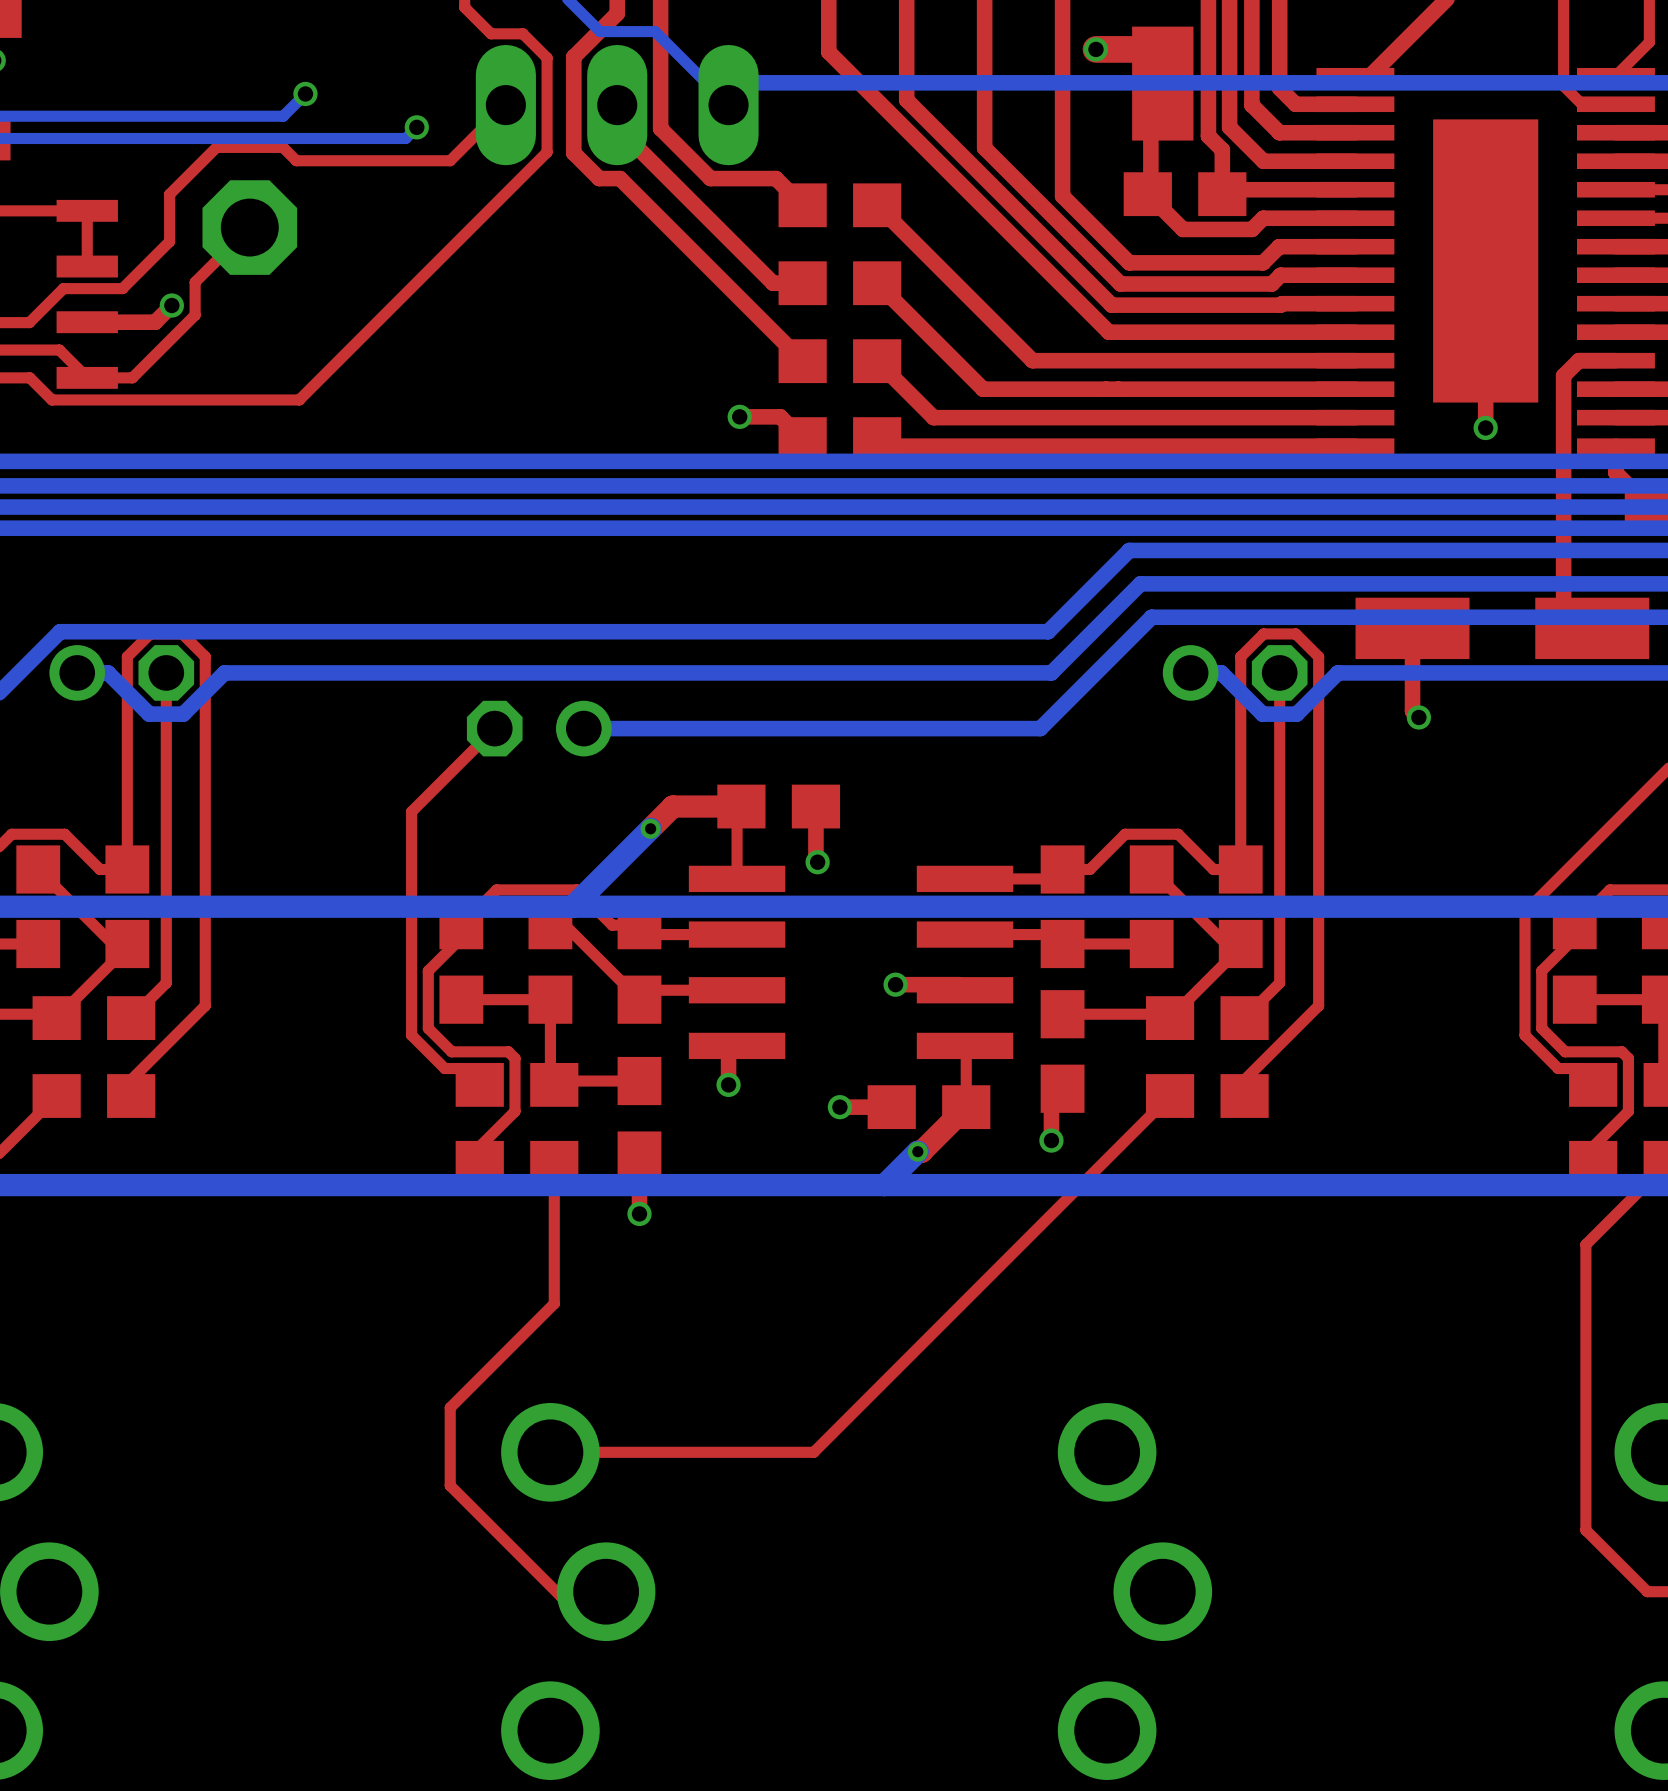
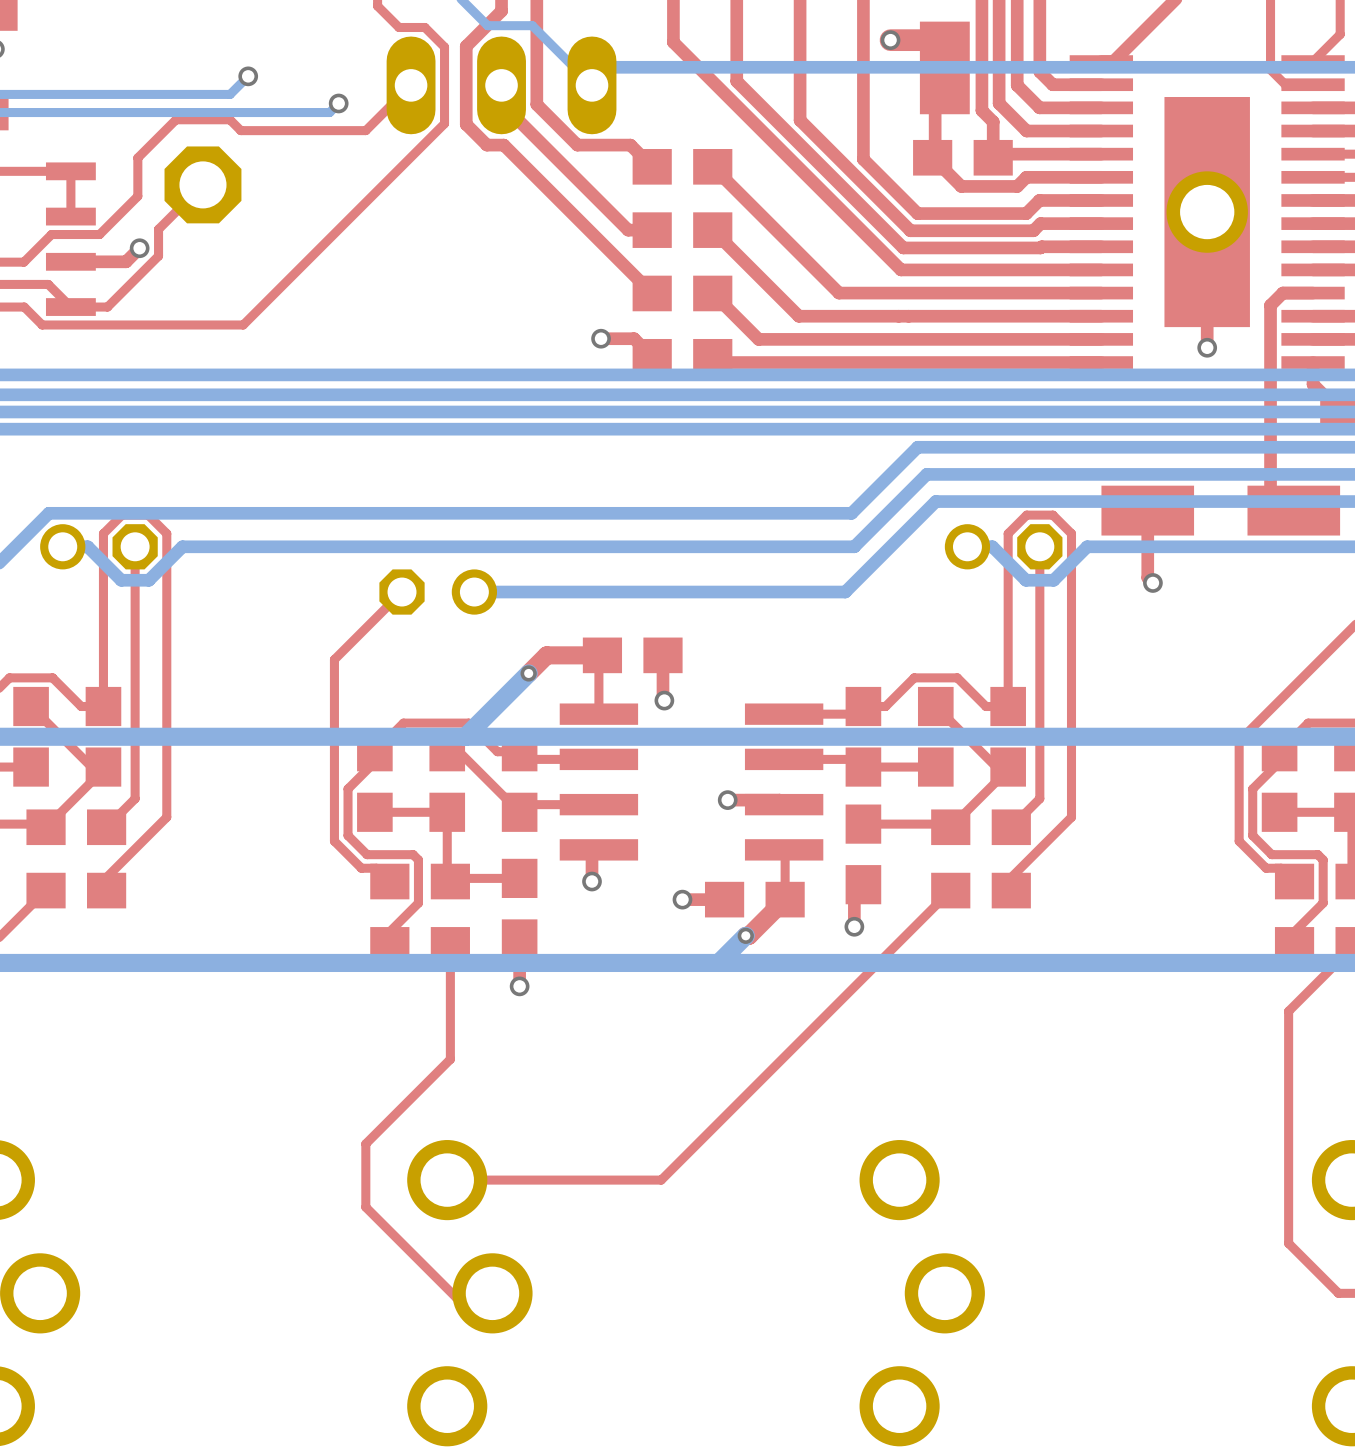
part footprint: [1316, 67, 1655, 454] -> [1069, 55, 1345, 369]

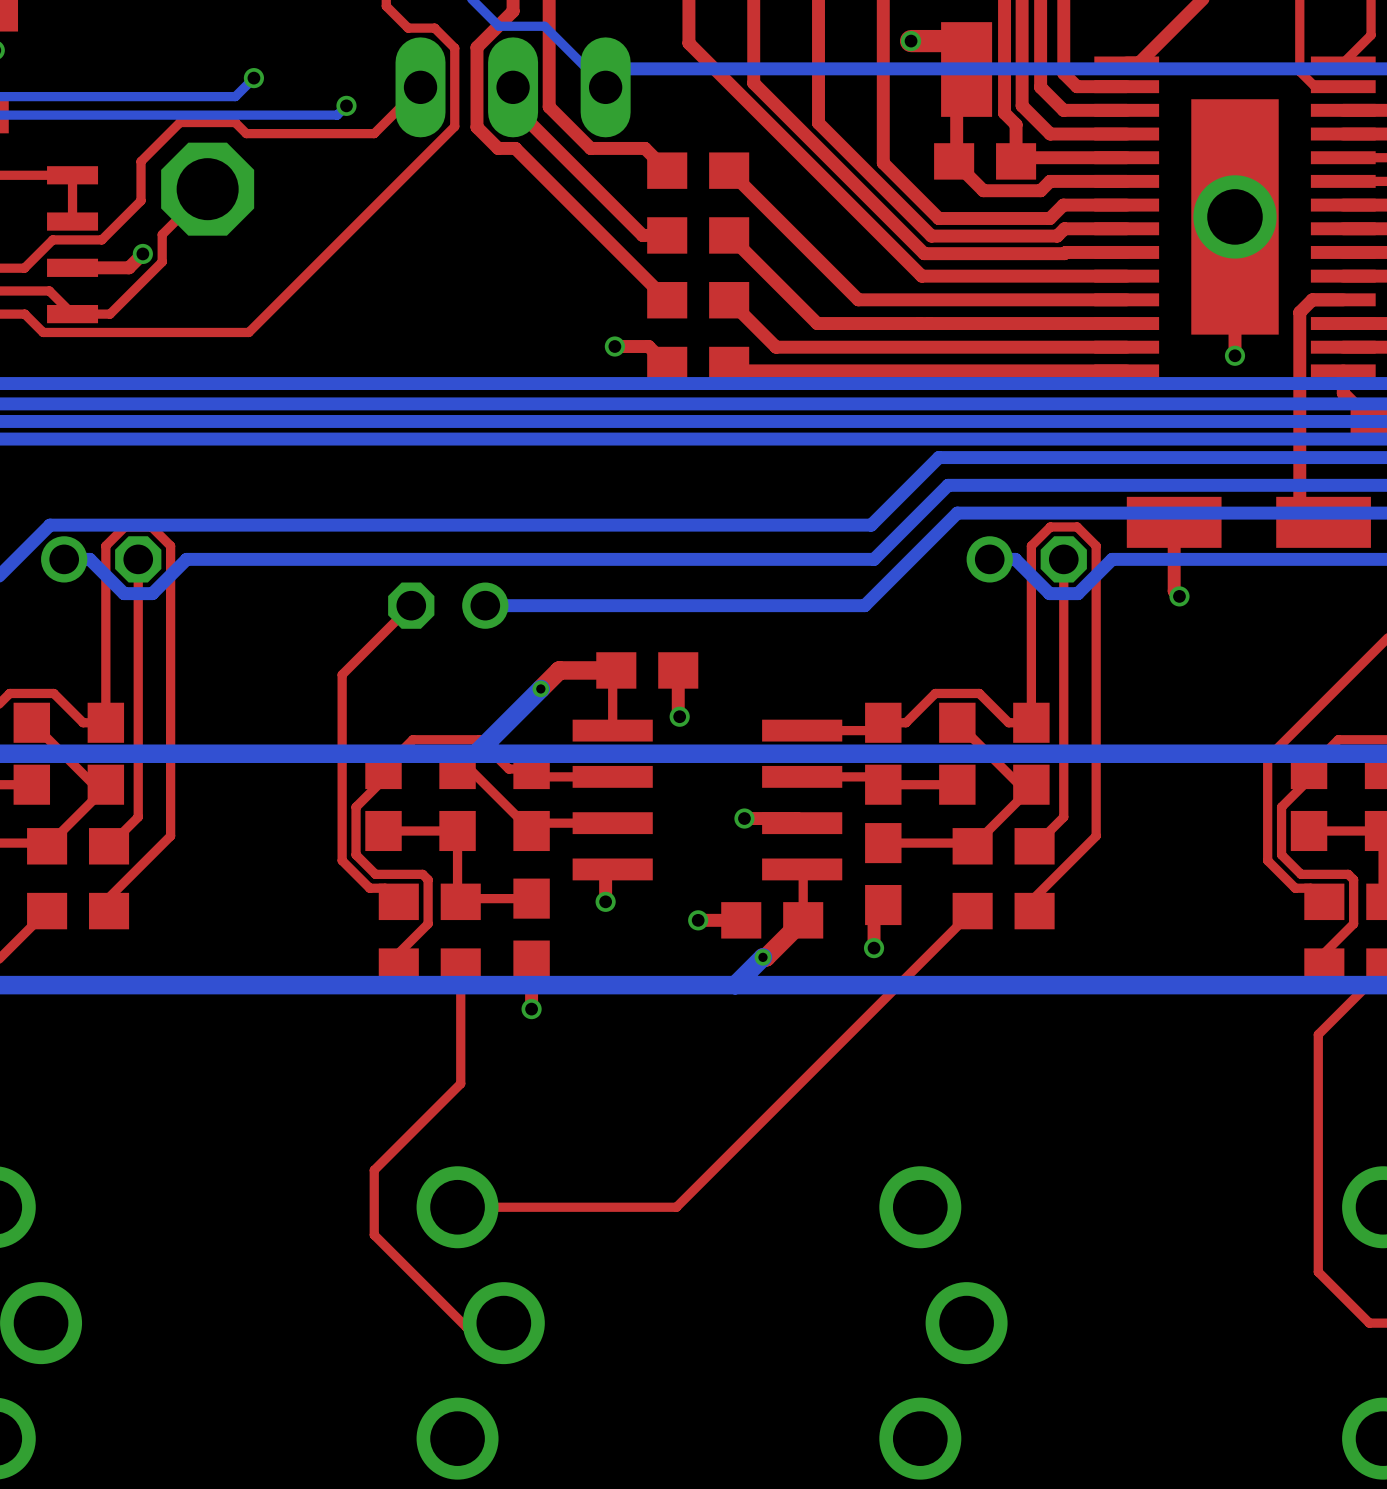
part footprint: [164, 146, 242, 224] -> [161, 142, 255, 236]

